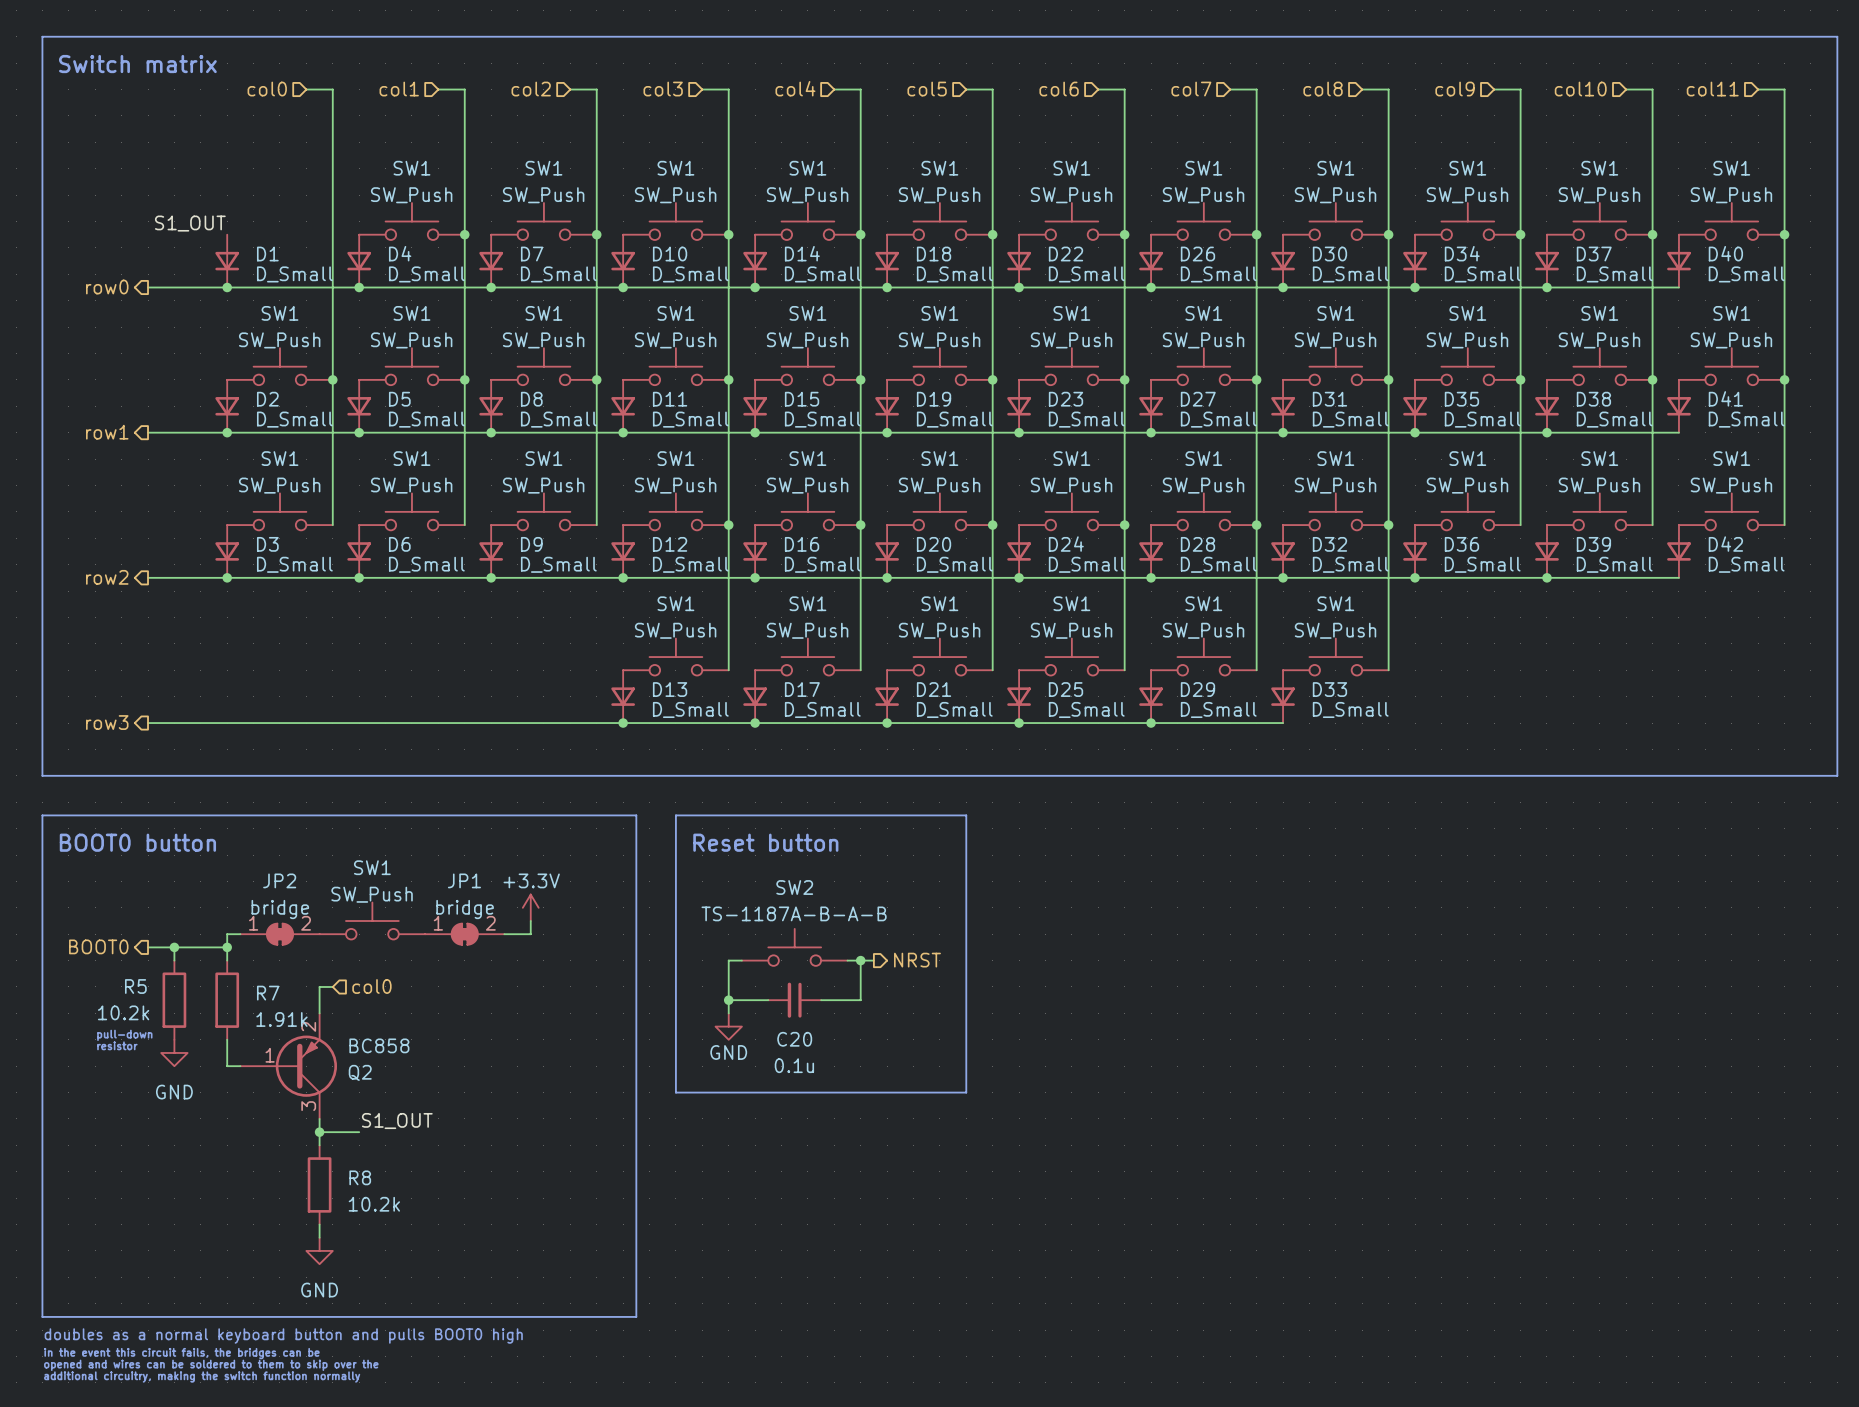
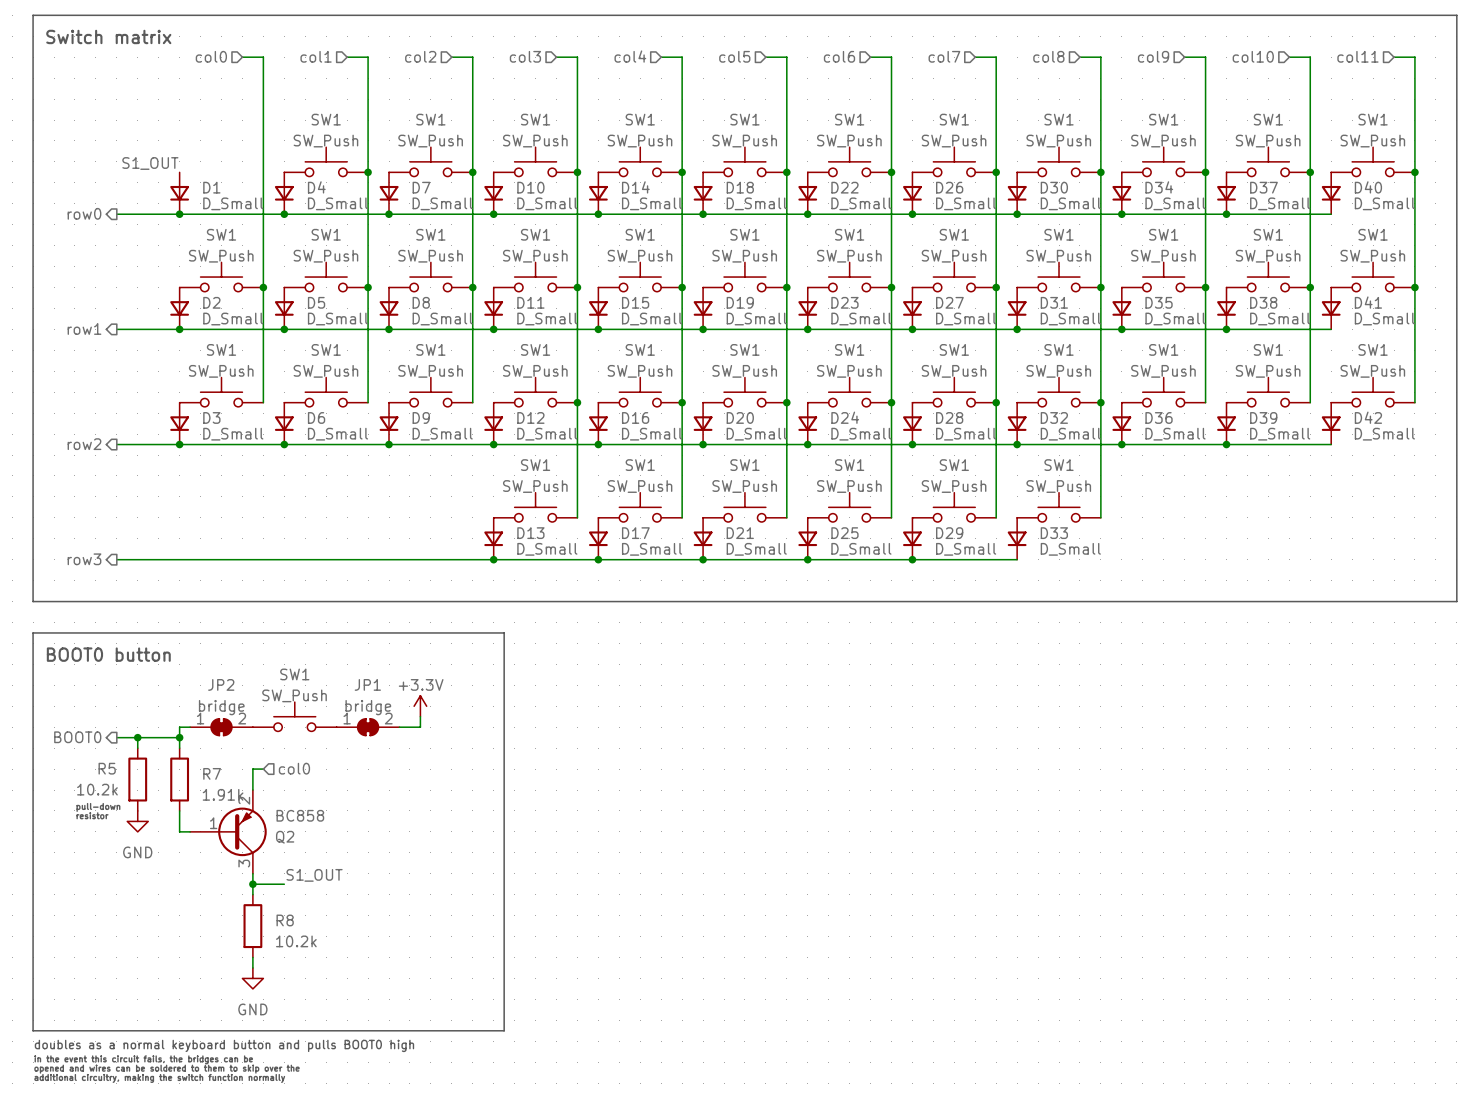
line: (675, 815) (966, 815) (966, 1092) (675, 1092) (675, 815) -> none
text: Reset button (765, 842) -> none
SW2: TS-1187A-B-A-B (794, 947) -> none
wire: (741, 960) (728, 960) (728, 1013) -> none
wire: (847, 960) (873, 960) -> none
wire: (860, 960) (860, 1000) (821, 1000) -> none
junction: (860, 960) -> none
hierarchical label: NRST (917, 960) -> none
wire: (728, 1000) (768, 1000) -> none
junction: (728, 1000) -> none
C20: 0.1u (794, 1000) -> none
power symbol: GND (728, 1026) -> none

